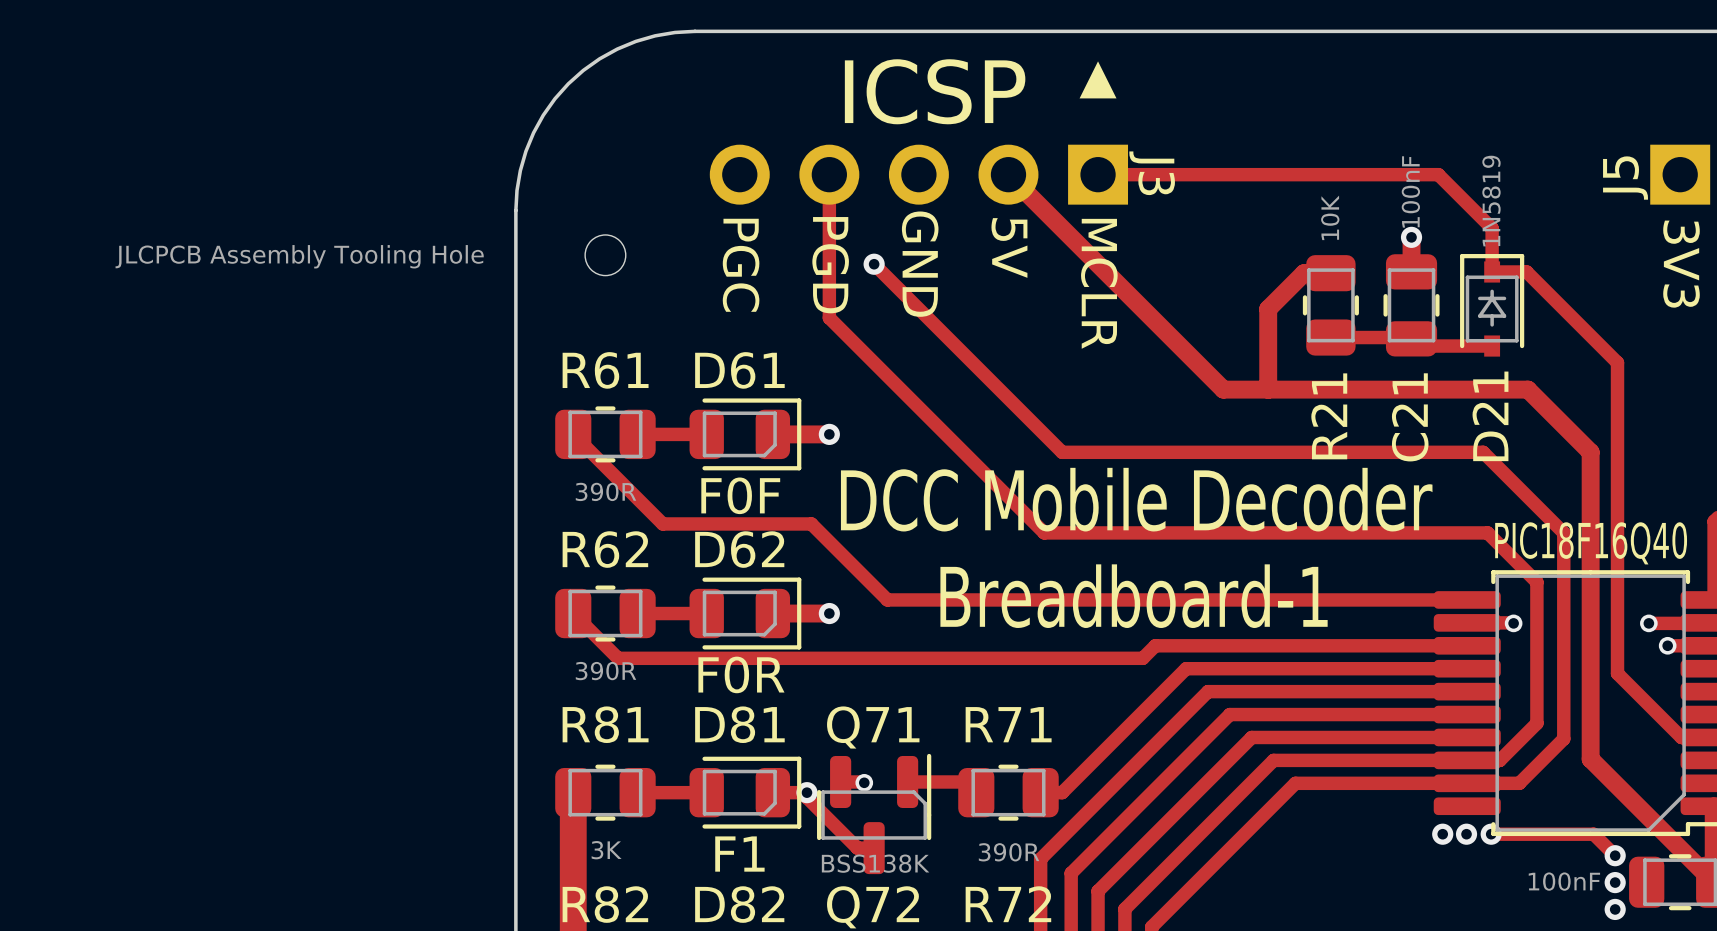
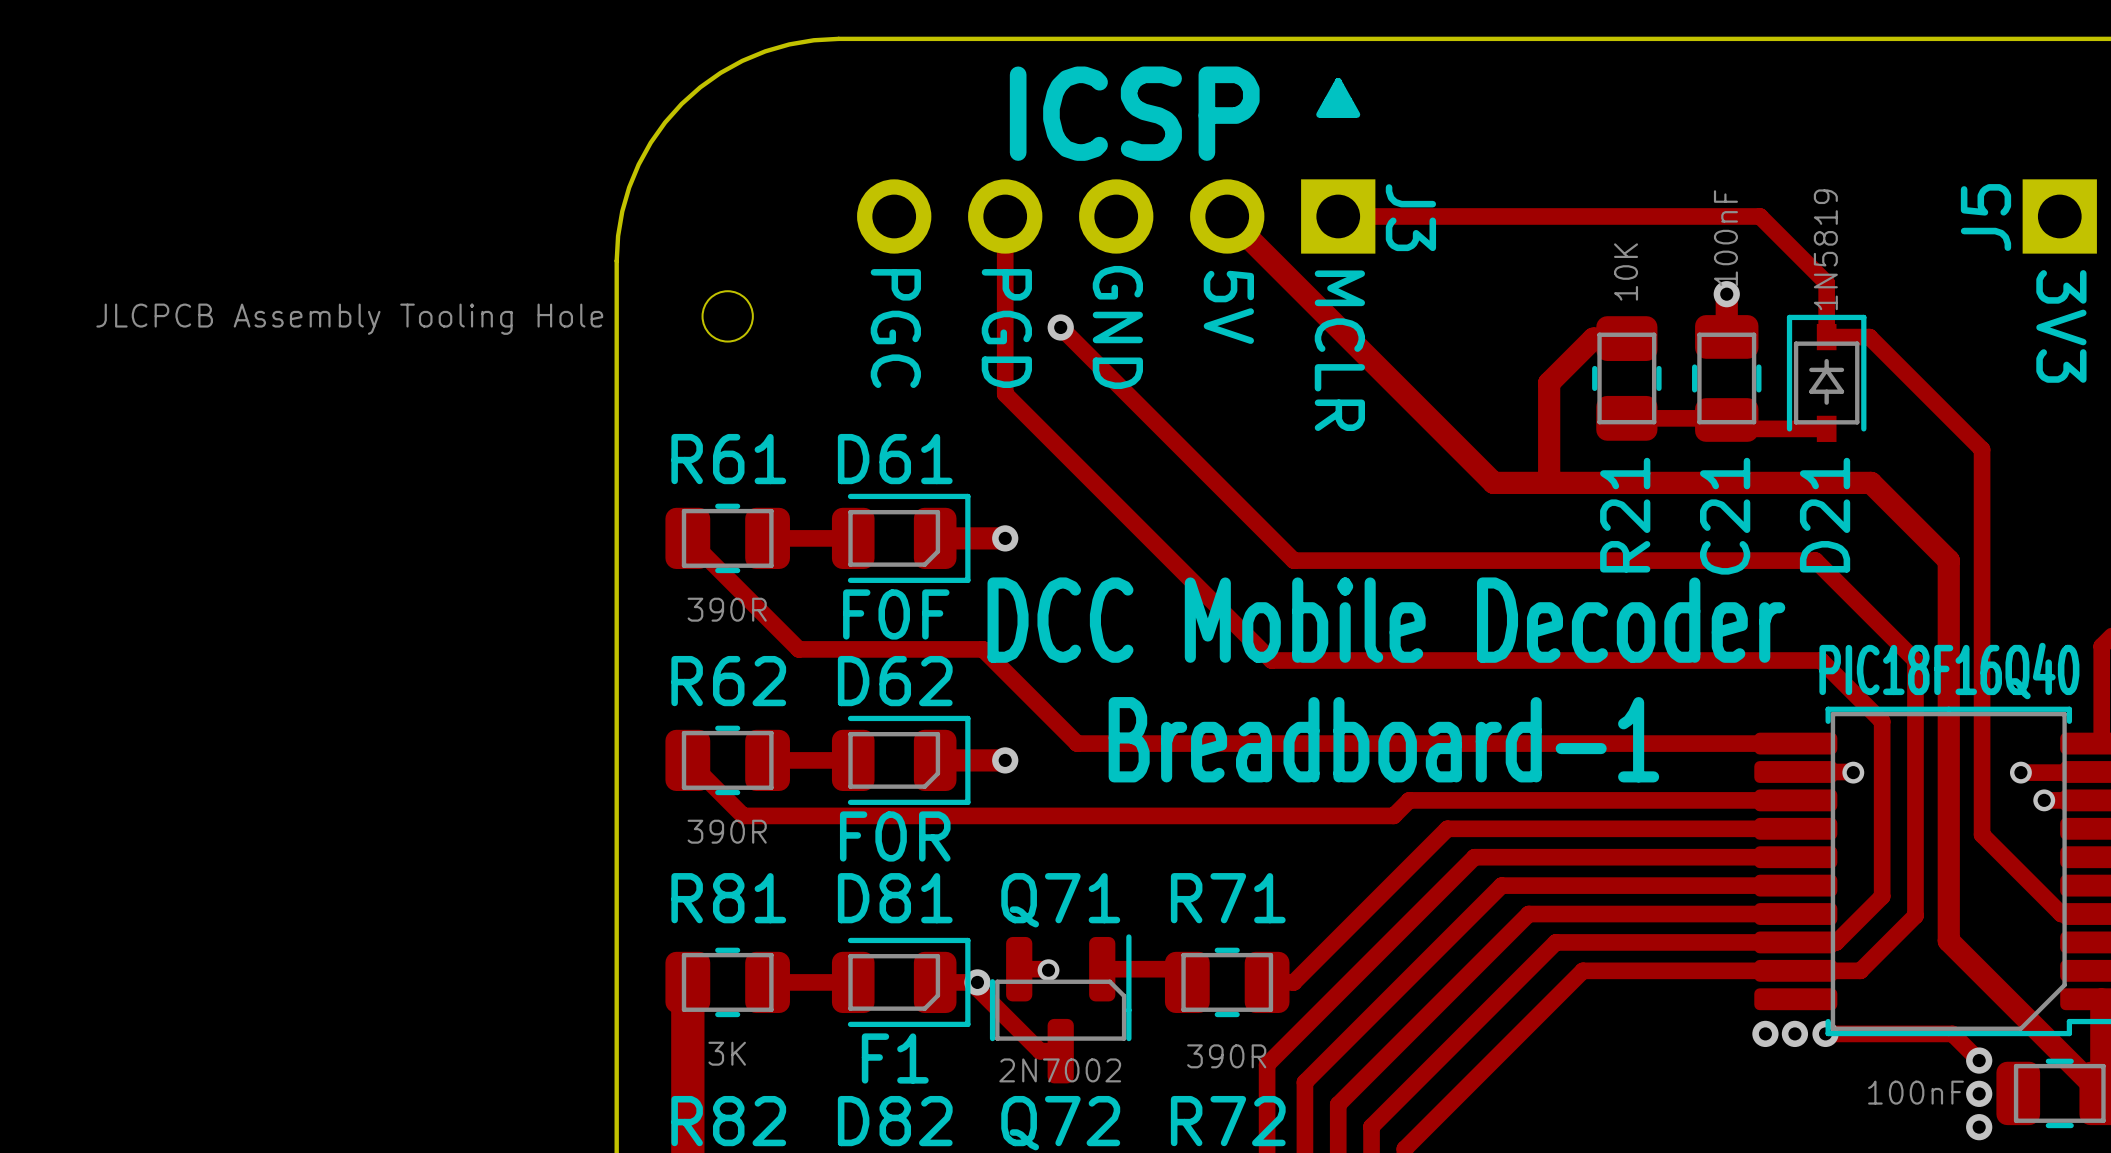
Q71 value: BSS138K (875, 863) -> 2N7002 (1060, 1070)

